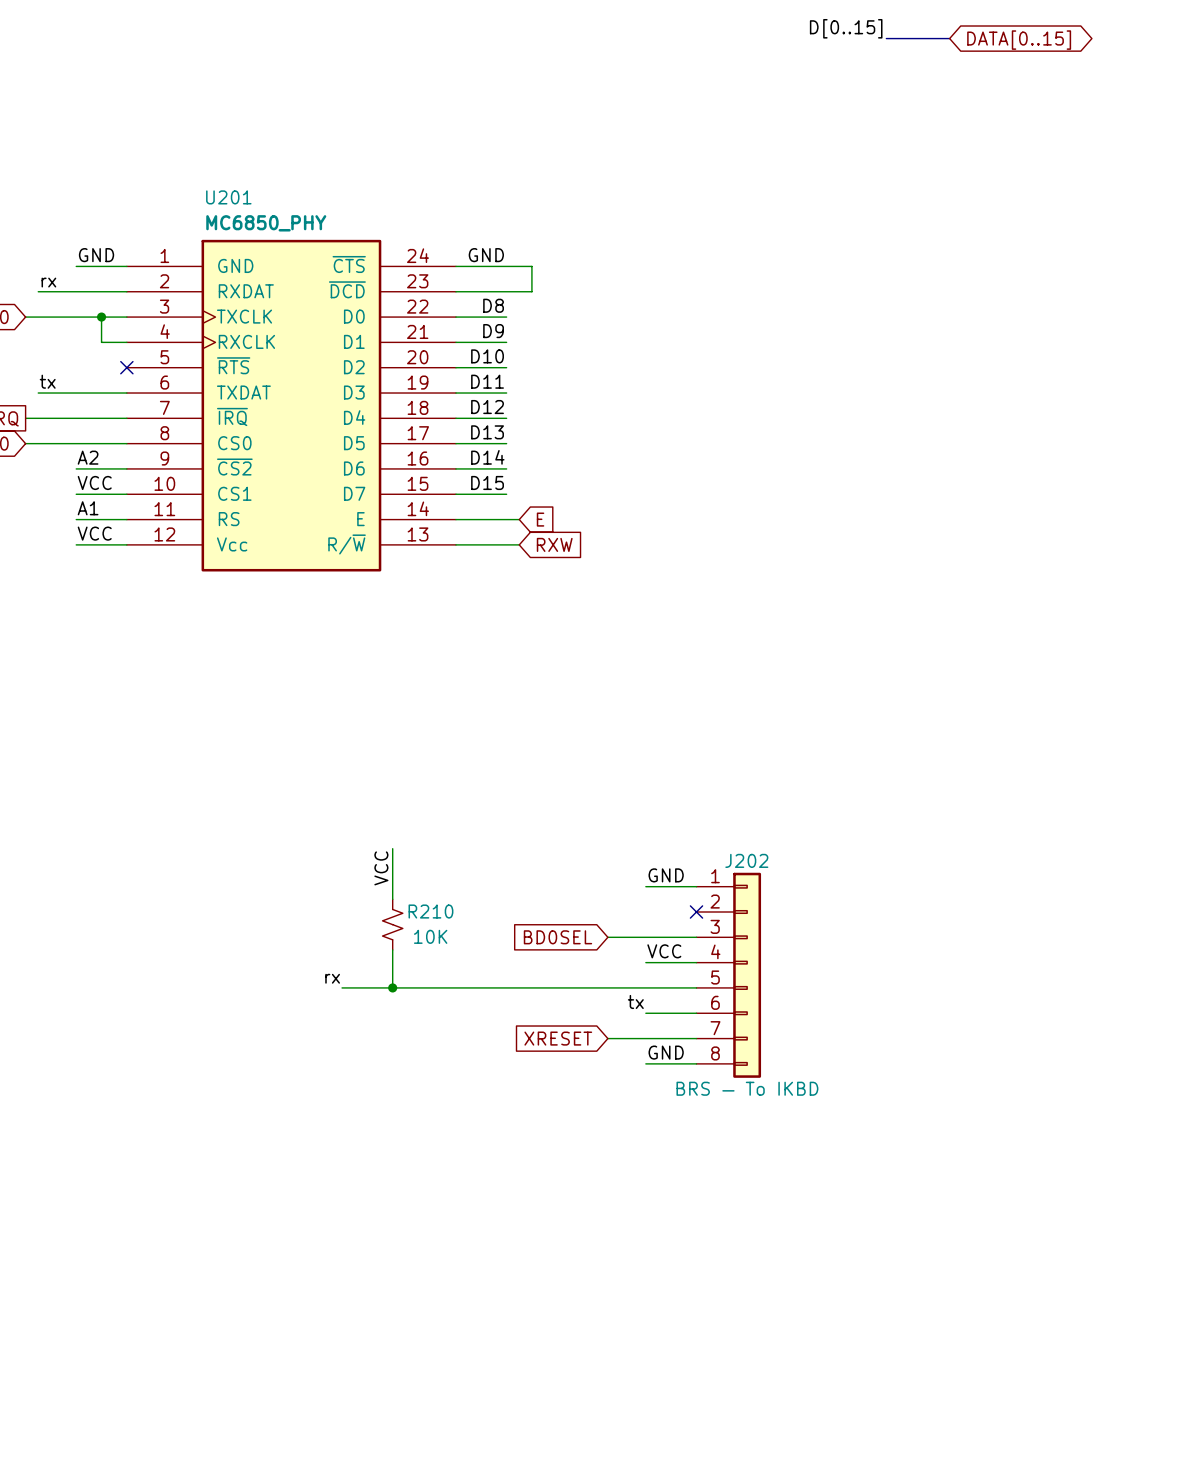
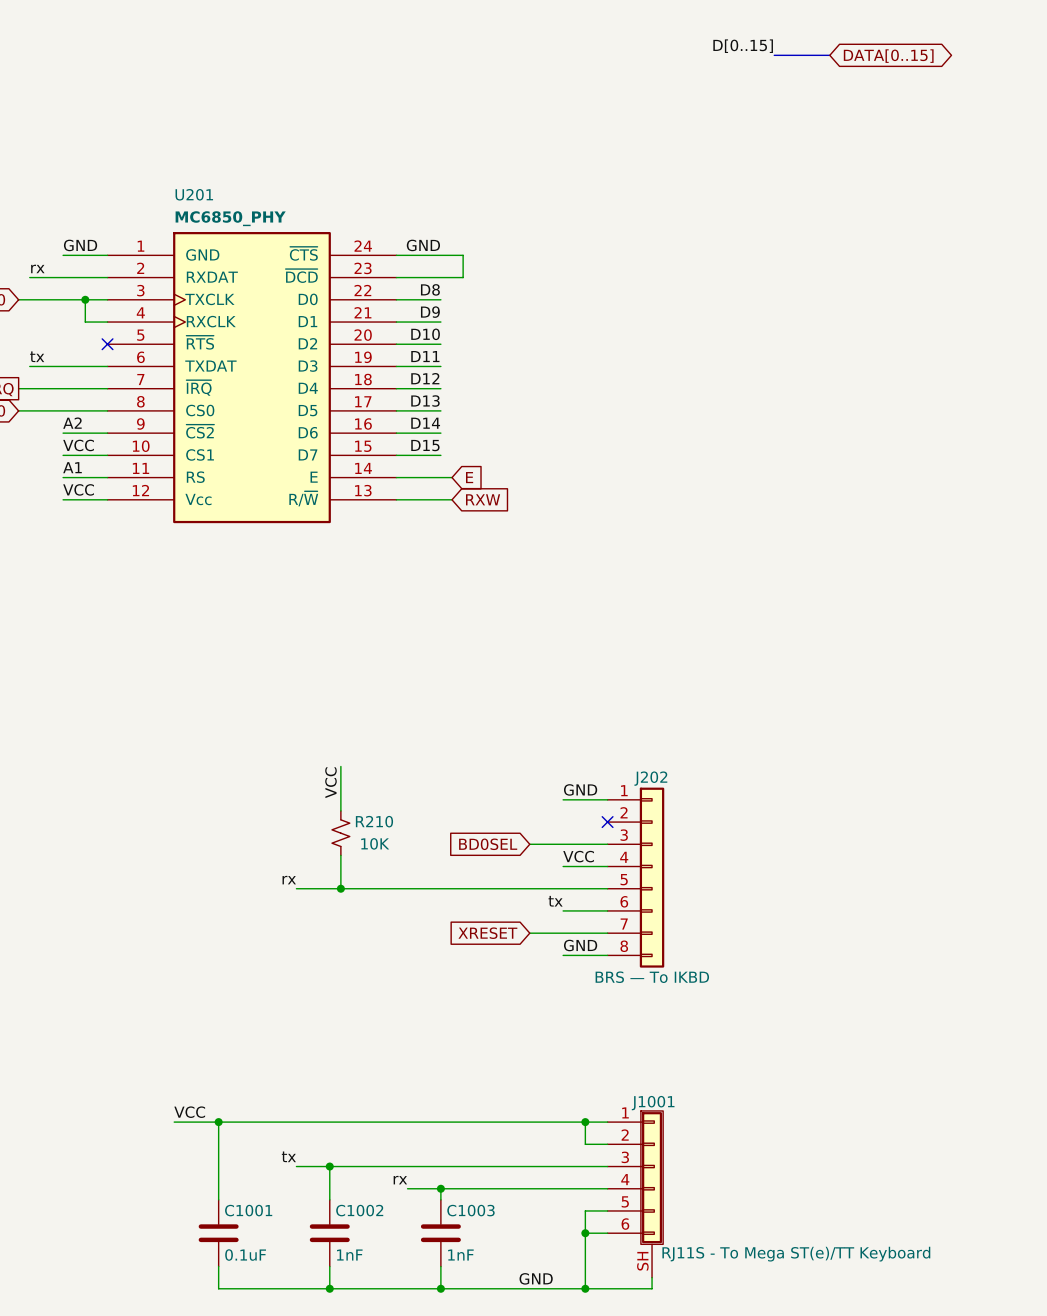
label: none -> VCC (189, 1112)
wire: none -> (174, 1122) (607, 1122)
wire: none -> (218, 1122) (218, 1199)
junction: none -> (218, 1122)
wire: none -> (585, 1122) (585, 1144) (607, 1144)
junction: none -> (585, 1122)
label: none -> tx (288, 1156)
wire: none -> (296, 1166) (607, 1166)
wire: none -> (329, 1166) (329, 1199)
junction: none -> (329, 1166)
label: none -> rx (400, 1180)
wire: none -> (407, 1188) (607, 1188)
wire: none -> (440, 1188) (440, 1199)
junction: none -> (440, 1188)
J1001: none -> RJ11S - To Mega ST(e)/TT Keyboard (635, 1193)
wire: none -> (607, 1210) (585, 1210) (585, 1288)
C1001: none -> 0.1uF (218, 1233)
C1002: none -> 1nF (329, 1233)
C1003: none -> 1nF (440, 1233)
wire: none -> (585, 1233) (607, 1233)
junction: none -> (585, 1233)
wire: none -> (218, 1266) (218, 1288) (652, 1288) (652, 1277)
wire: none -> (329, 1266) (329, 1288)
wire: none -> (440, 1266) (440, 1288)
label: none -> GND (536, 1278)
junction: none -> (329, 1288)
junction: none -> (440, 1288)
junction: none -> (585, 1288)

